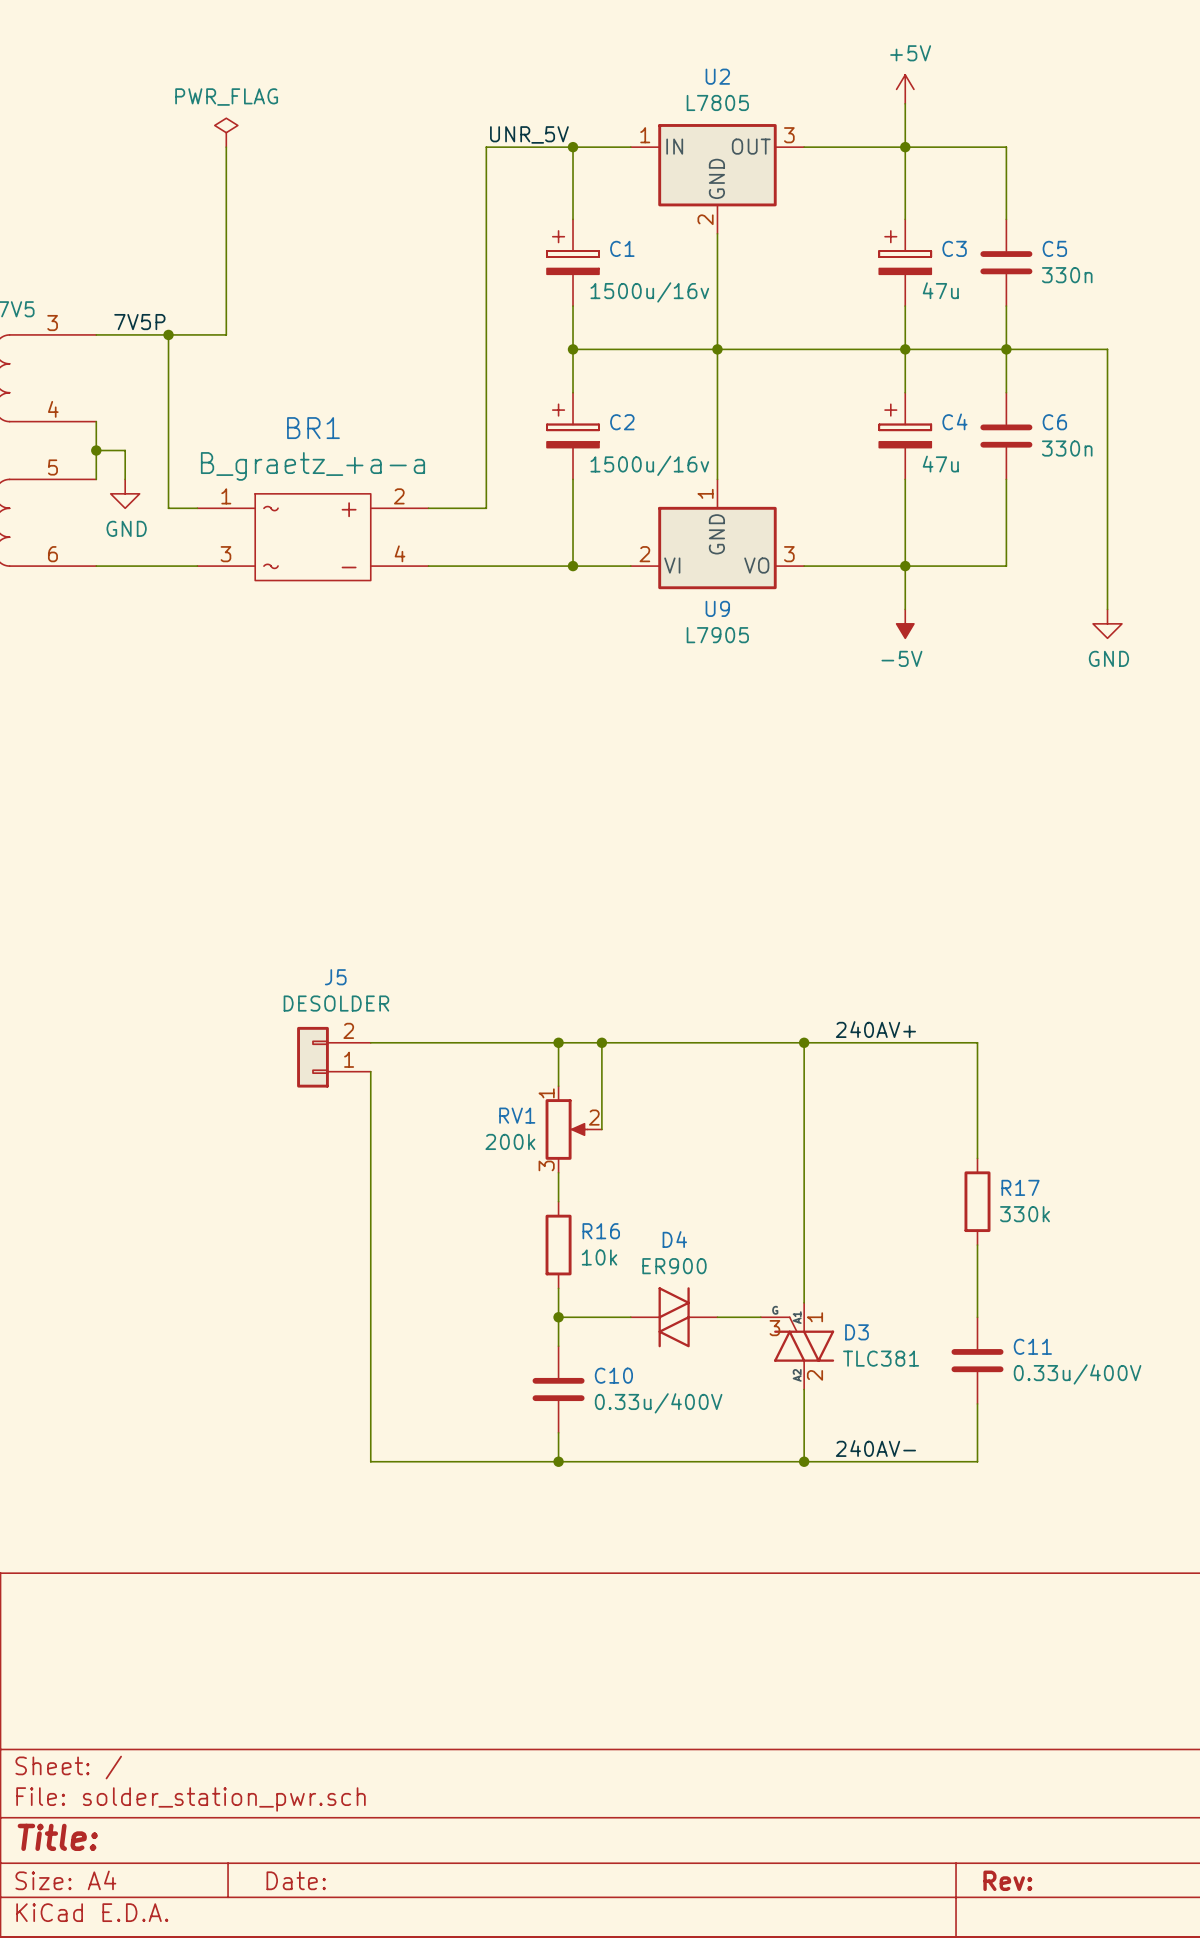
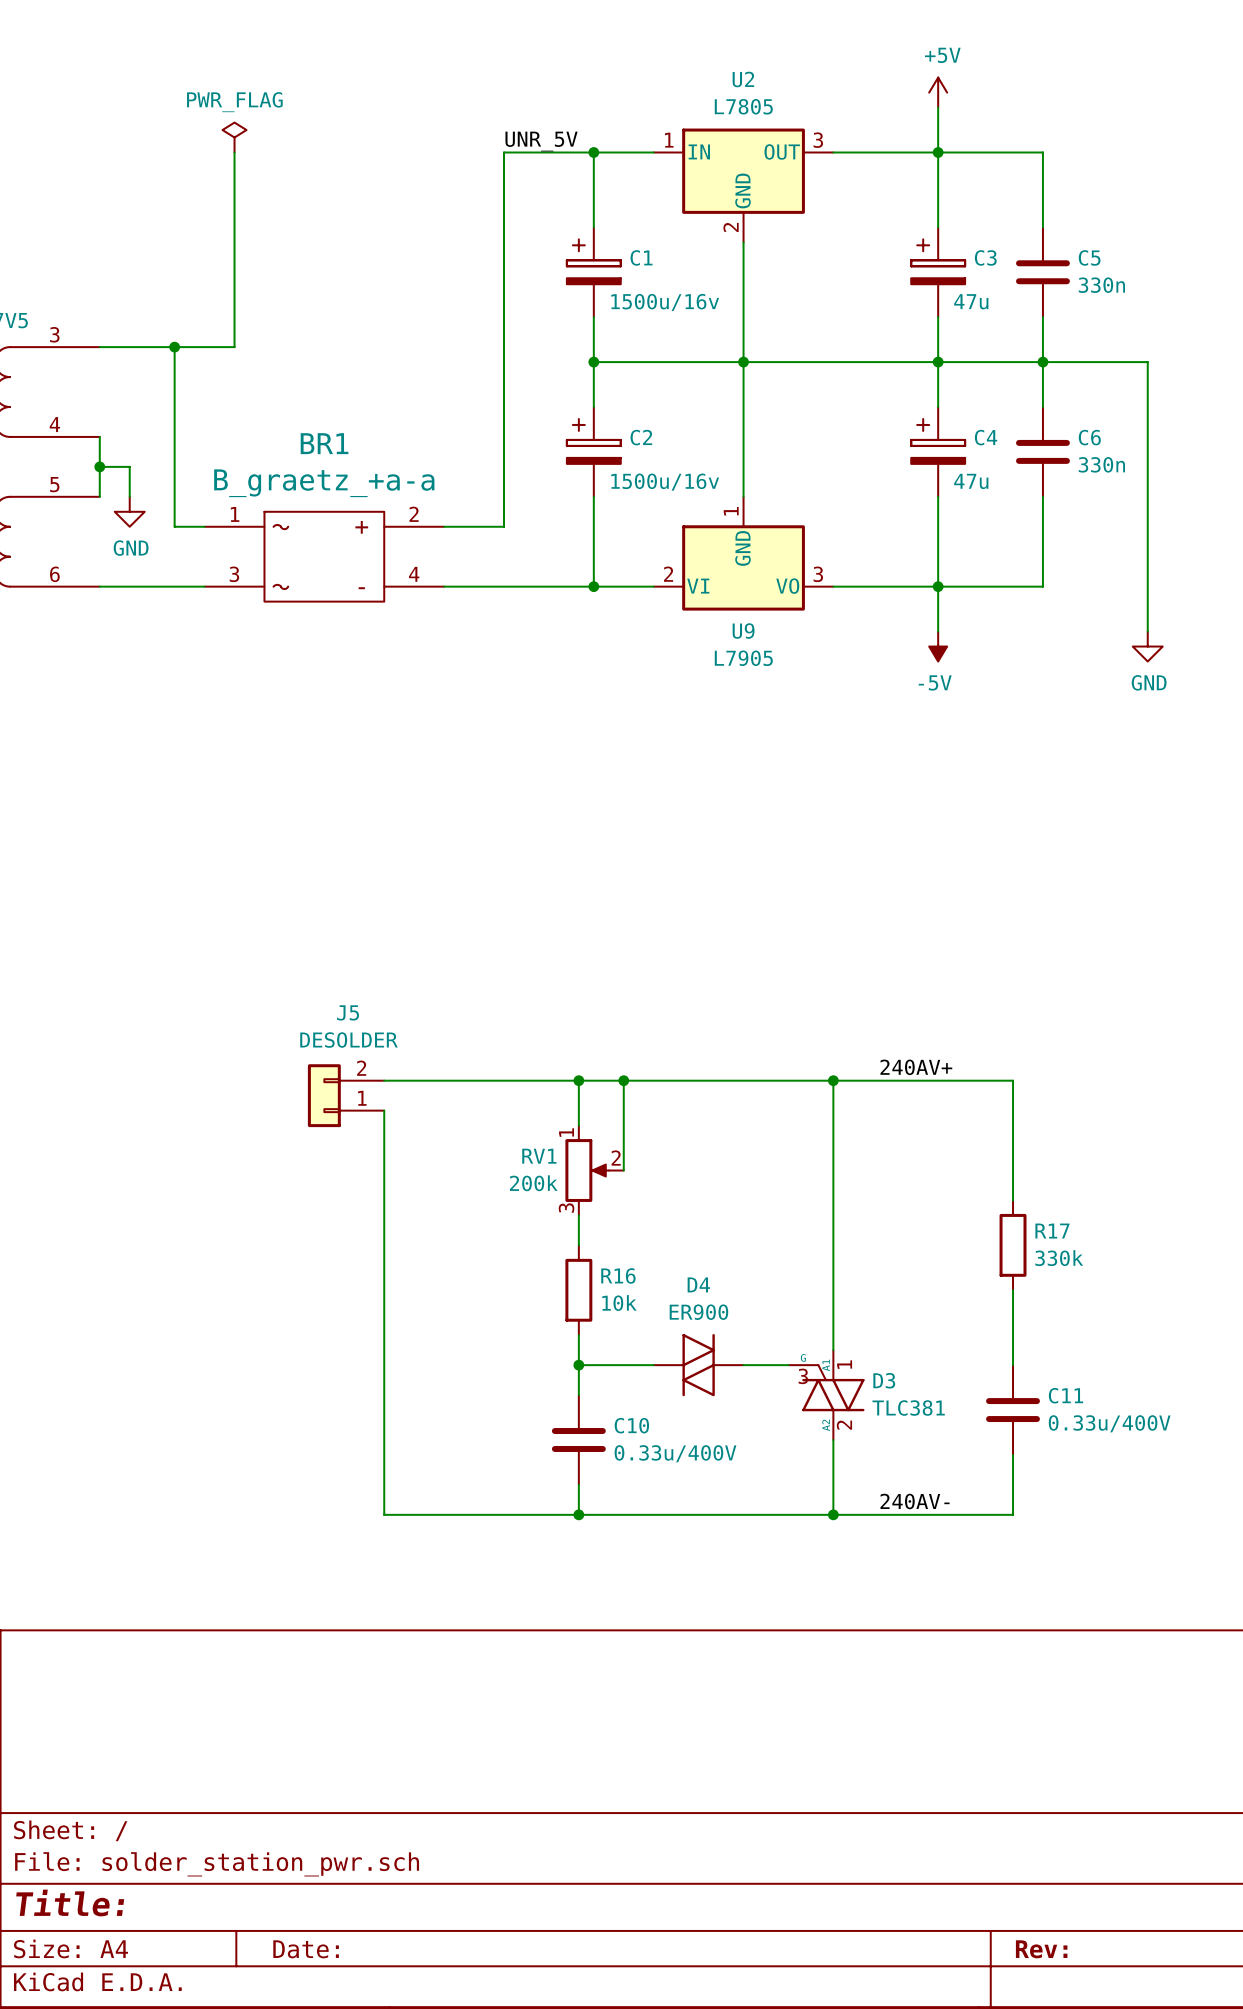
label: 7V5P (139, 322) -> none

